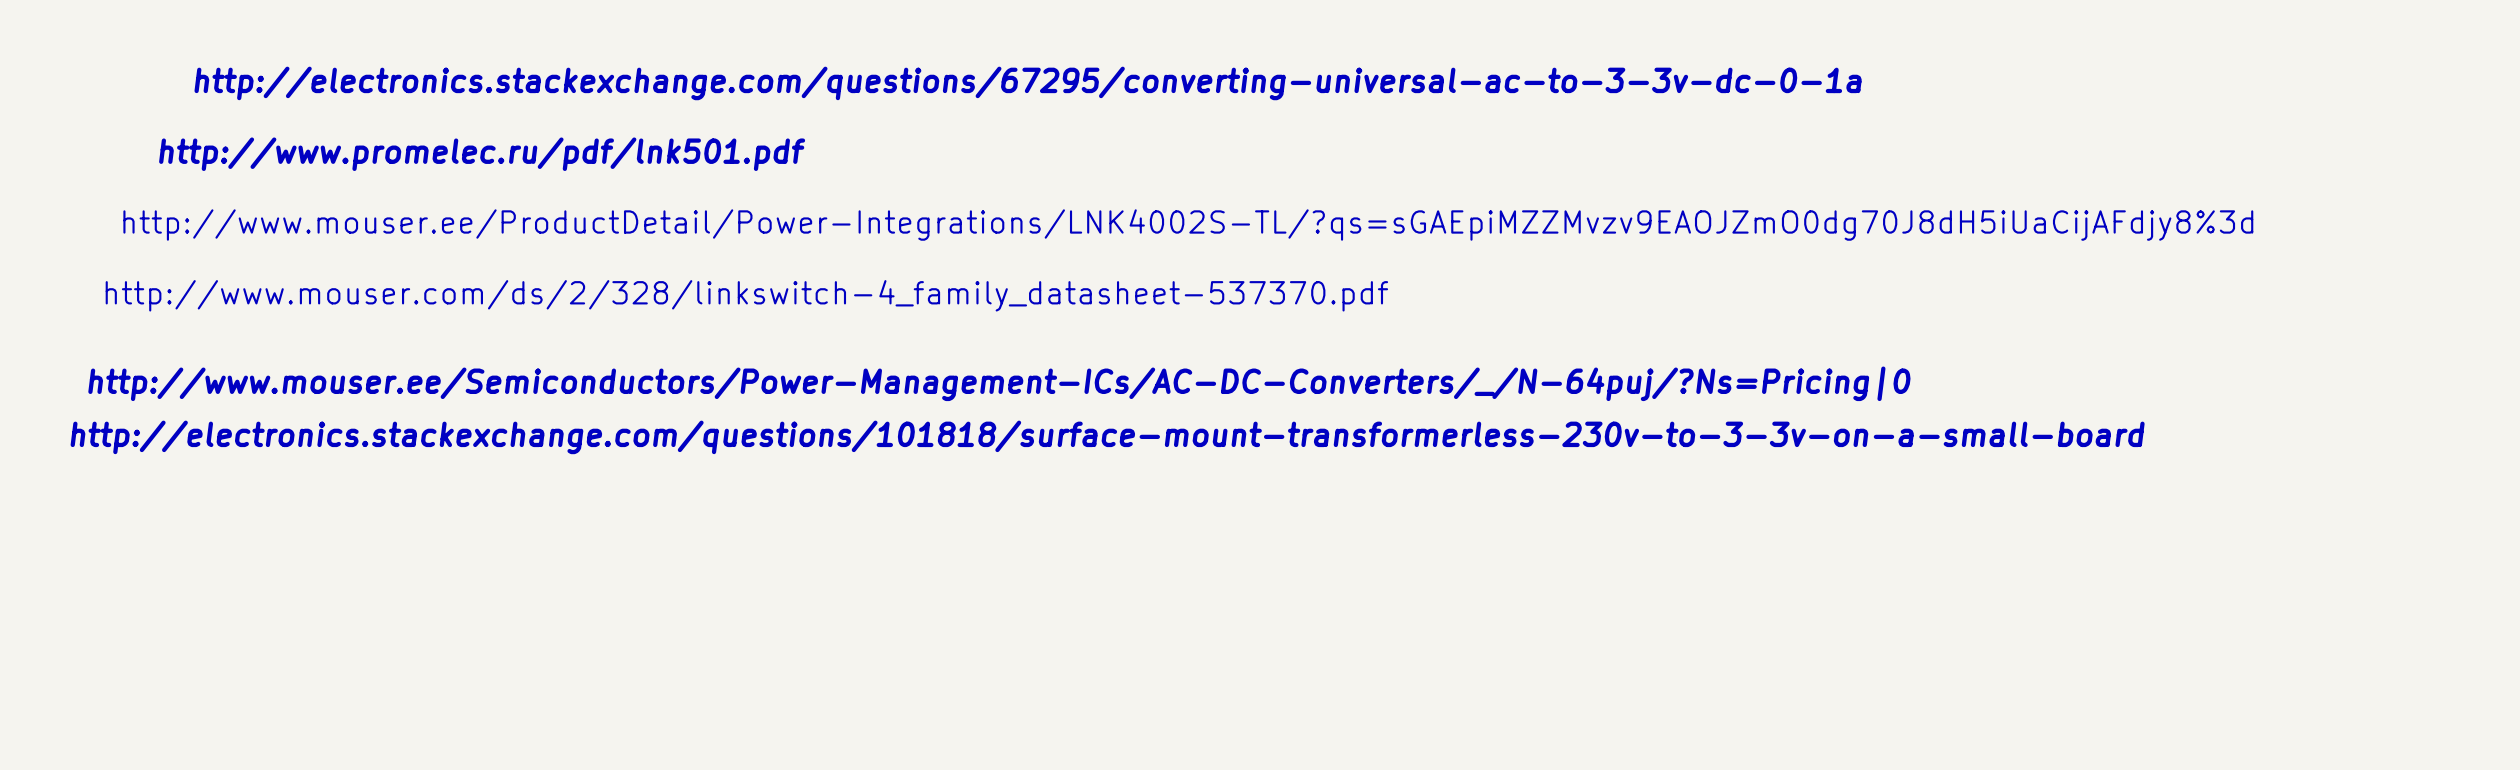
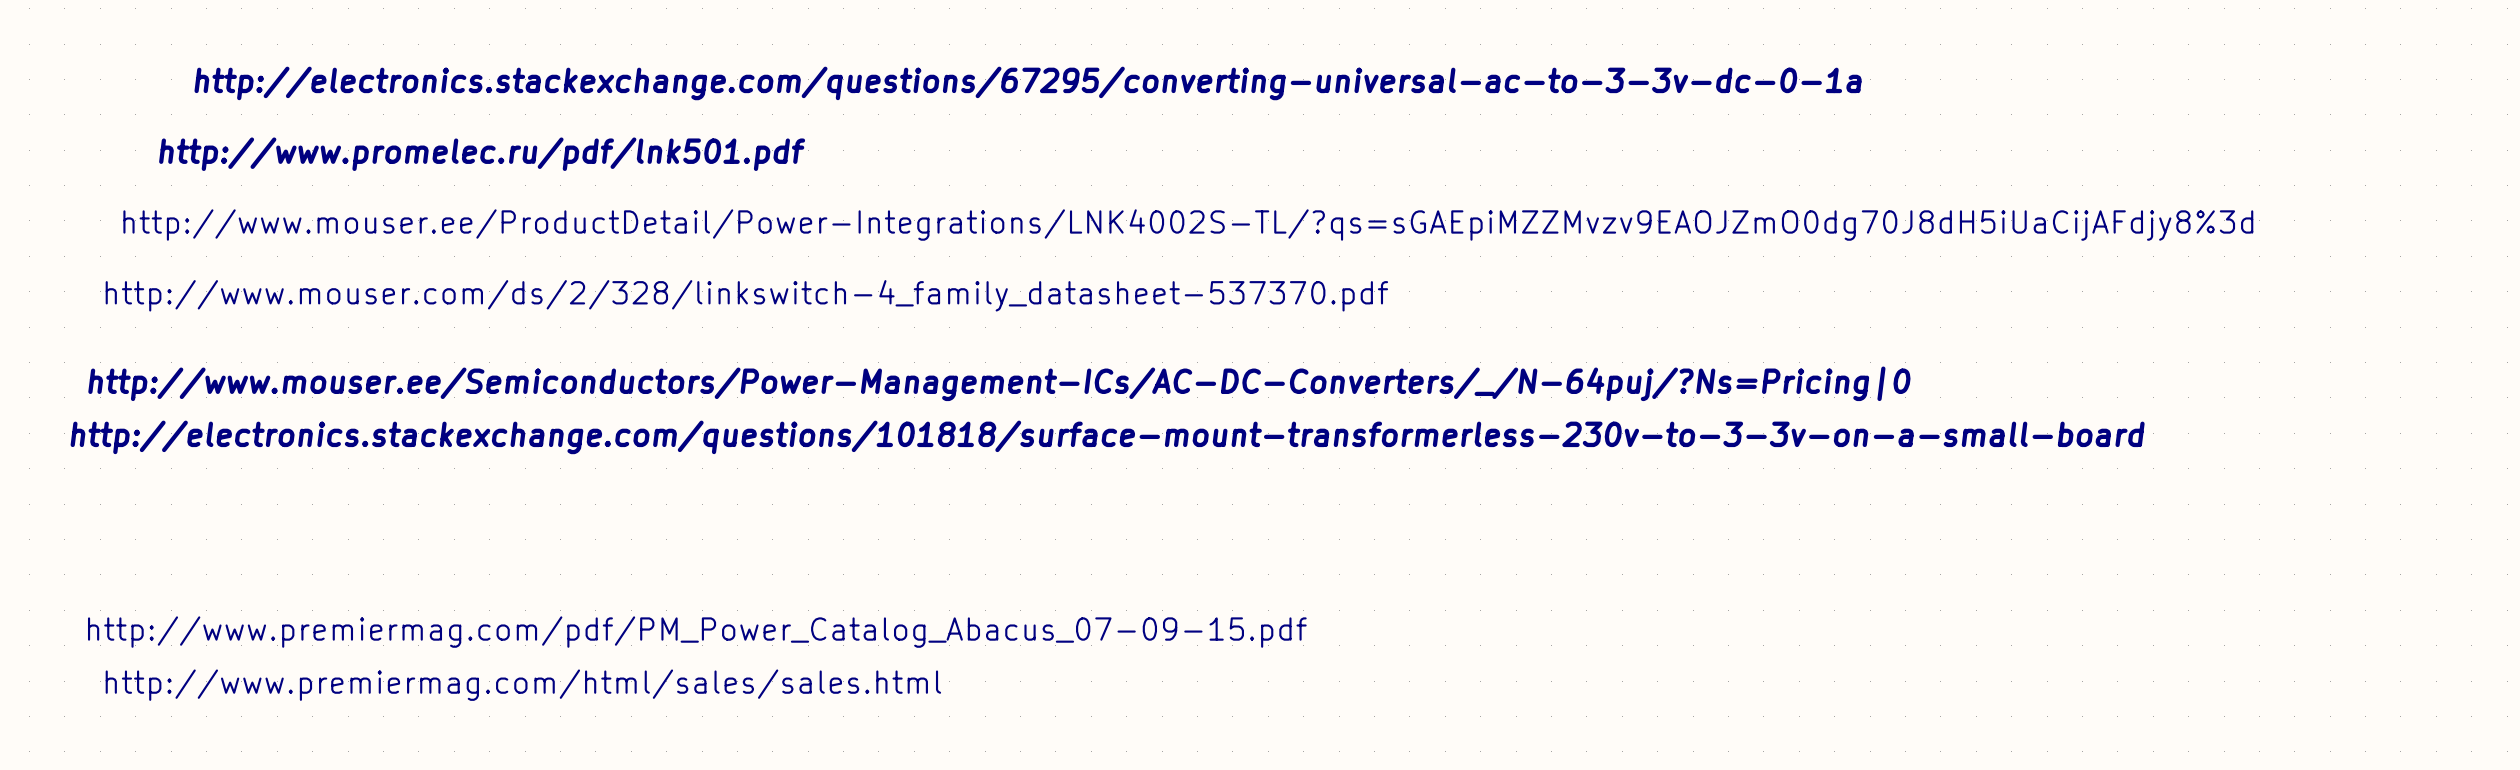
text: none -> http://www.premiermag.com/pdf/PM_Power_Catalog_Abacus_07-09-15.pdf (697, 632)
text: none -> http://www.premiermag.com/html/sales/sales.html (523, 685)

